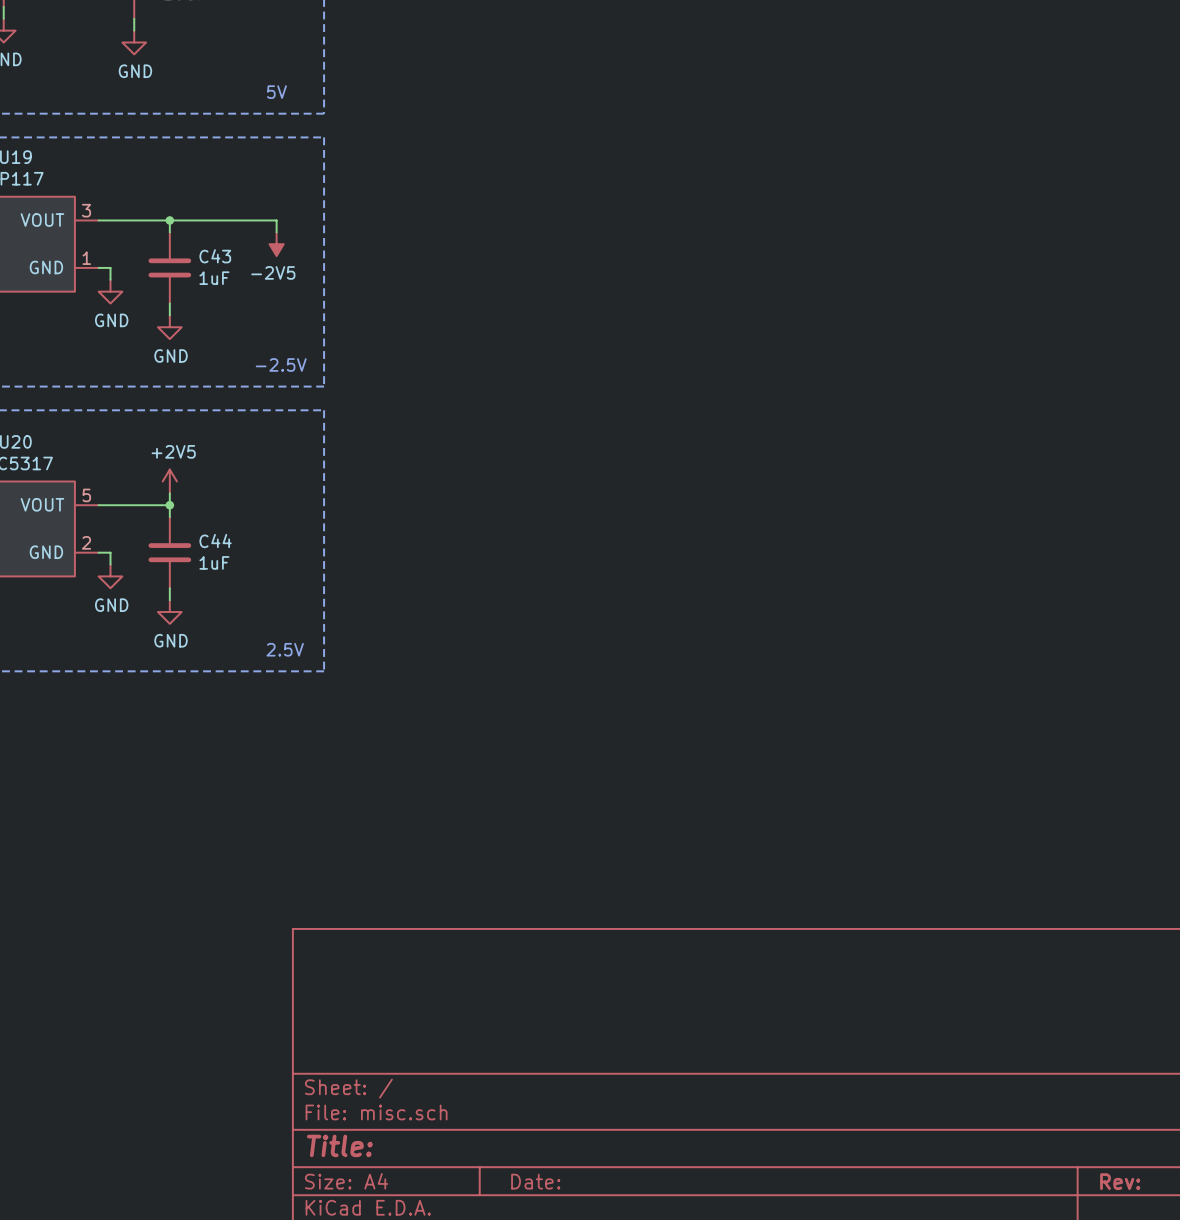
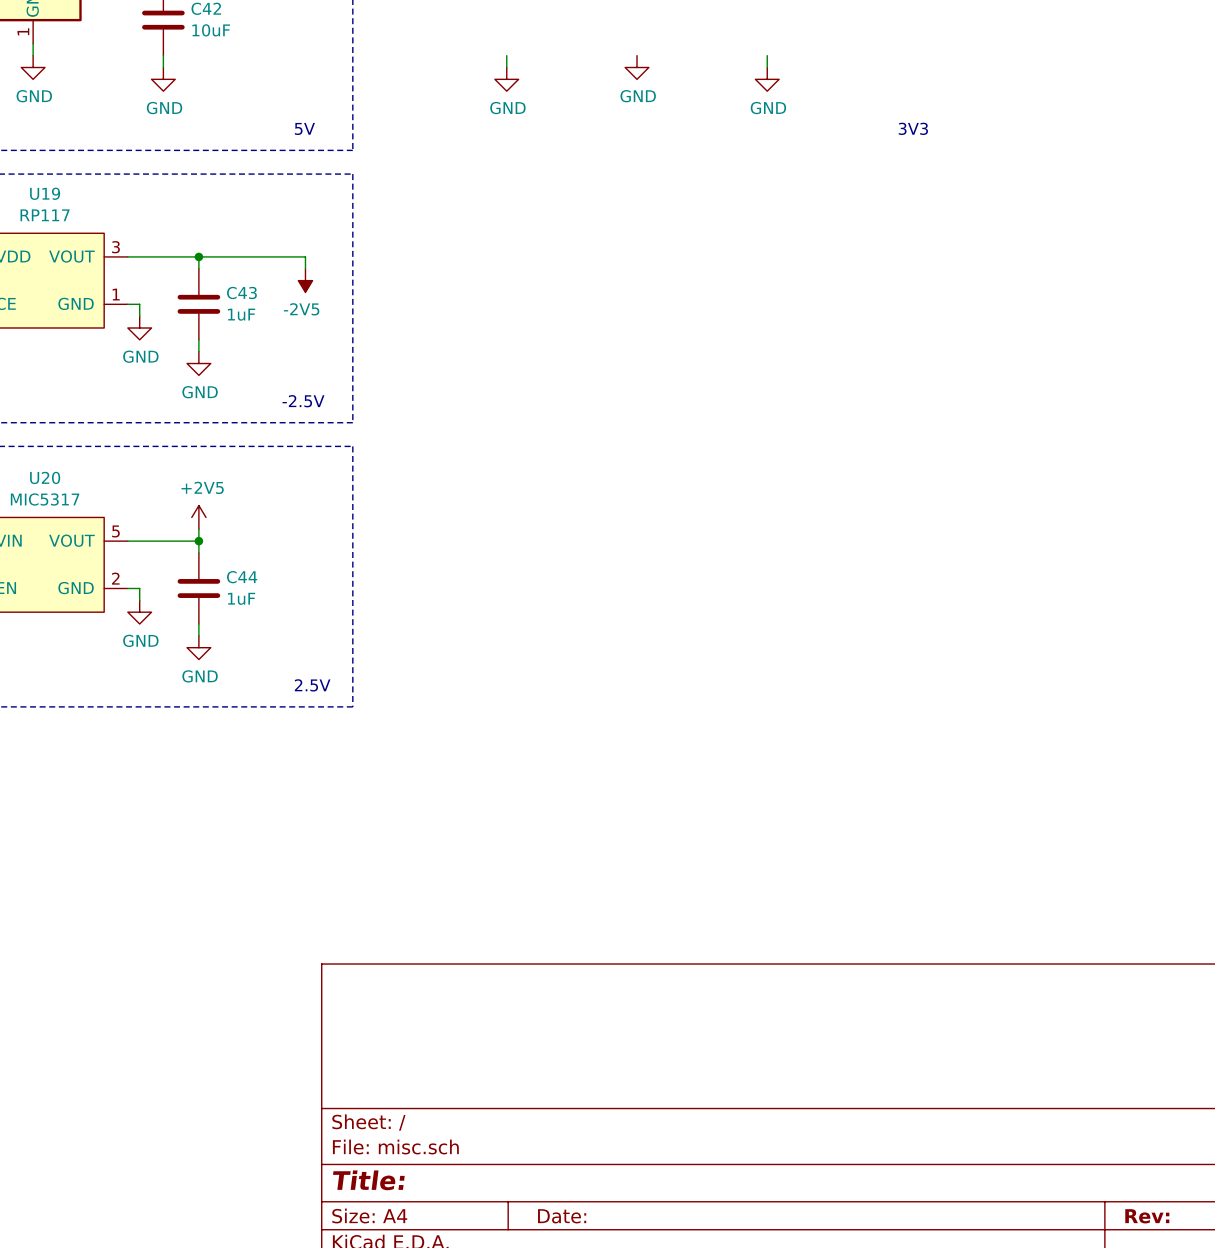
wire: none -> (506, 55) (506, 67)
wire: none -> (767, 55) (767, 67)
power symbol: none -> GND (637, 67)
power symbol: none -> GND (506, 79)
power symbol: none -> GND (767, 79)
text: none -> 3V3 (913, 128)

